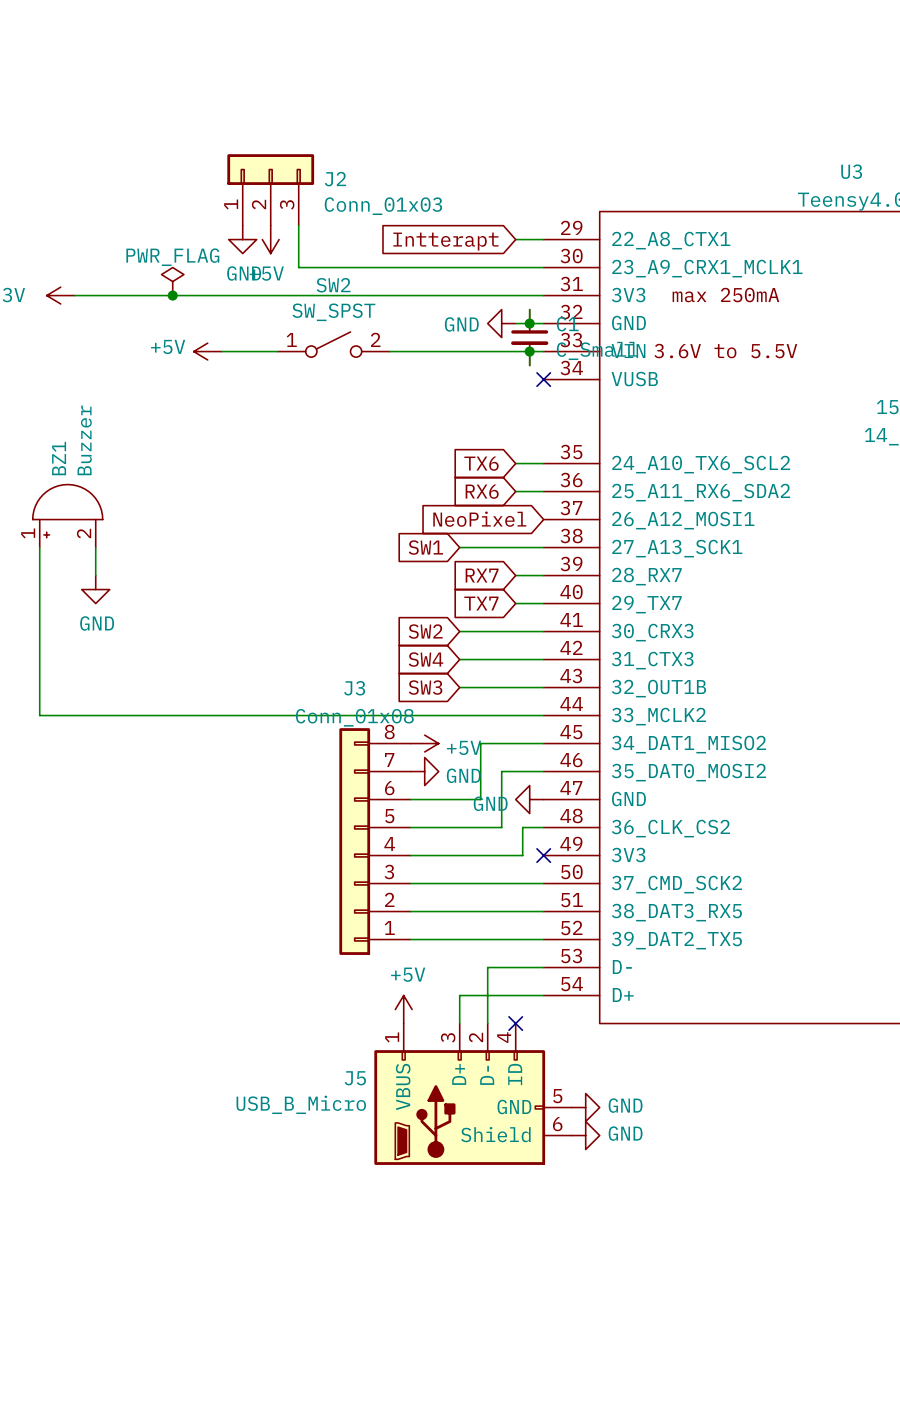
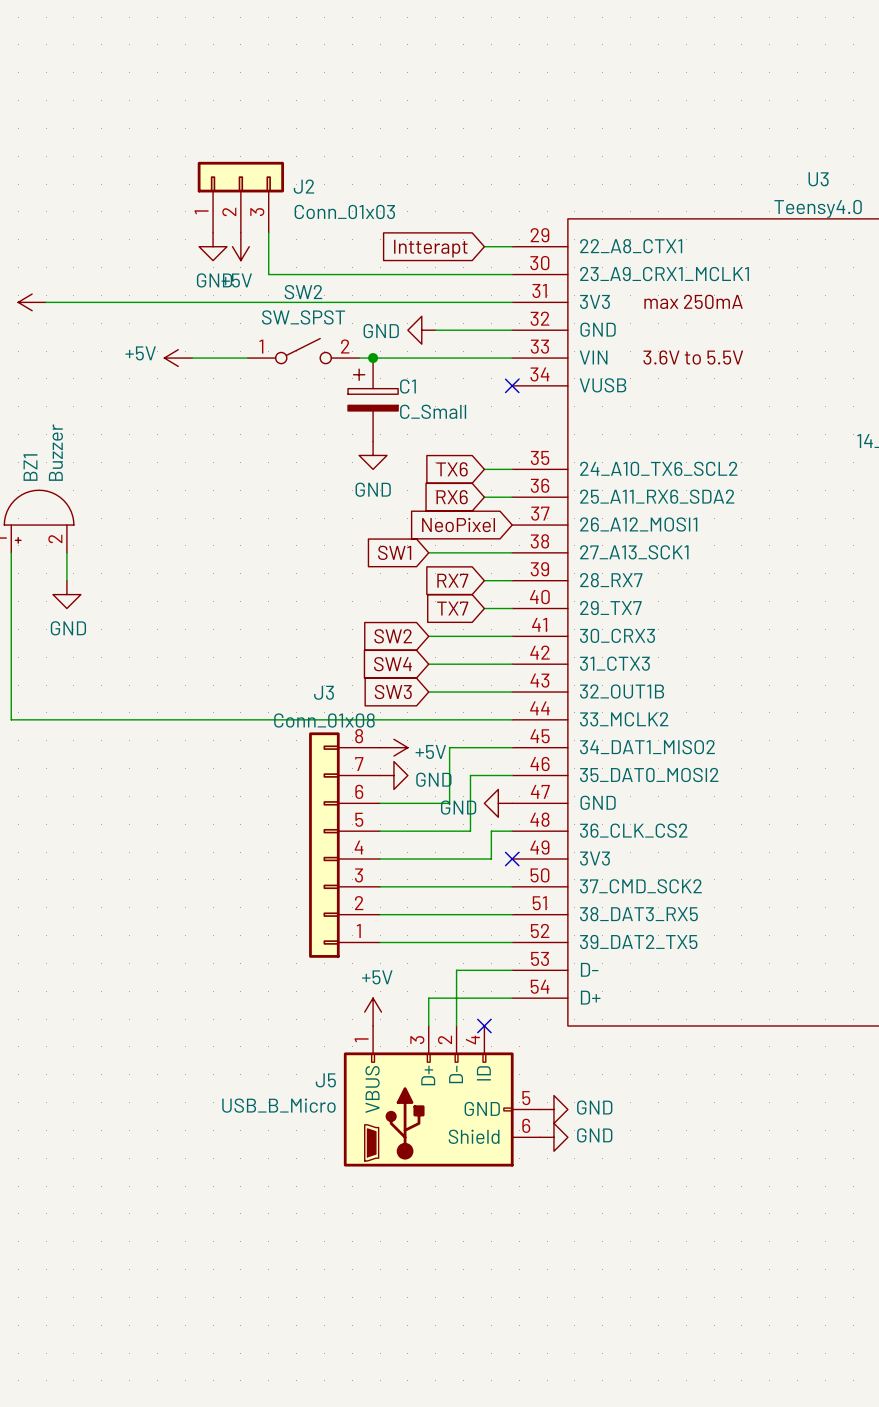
power symbol: PWR_FLAG (172, 281) -> none
junction: (172, 295) -> none
C1 symbol: [511, 309, 549, 366] -> [348, 358, 399, 442]
wire: (529, 309) (529, 323) -> none
wire: none -> (435, 330) (484, 330)
power symbol position: GND (501, 323) -> GND (421, 330)
junction: (529, 323) -> none
junction: none -> (373, 358)
wire: (529, 351) (529, 365) -> none
junction: (529, 351) -> none
power symbol: none -> GND (373, 455)

